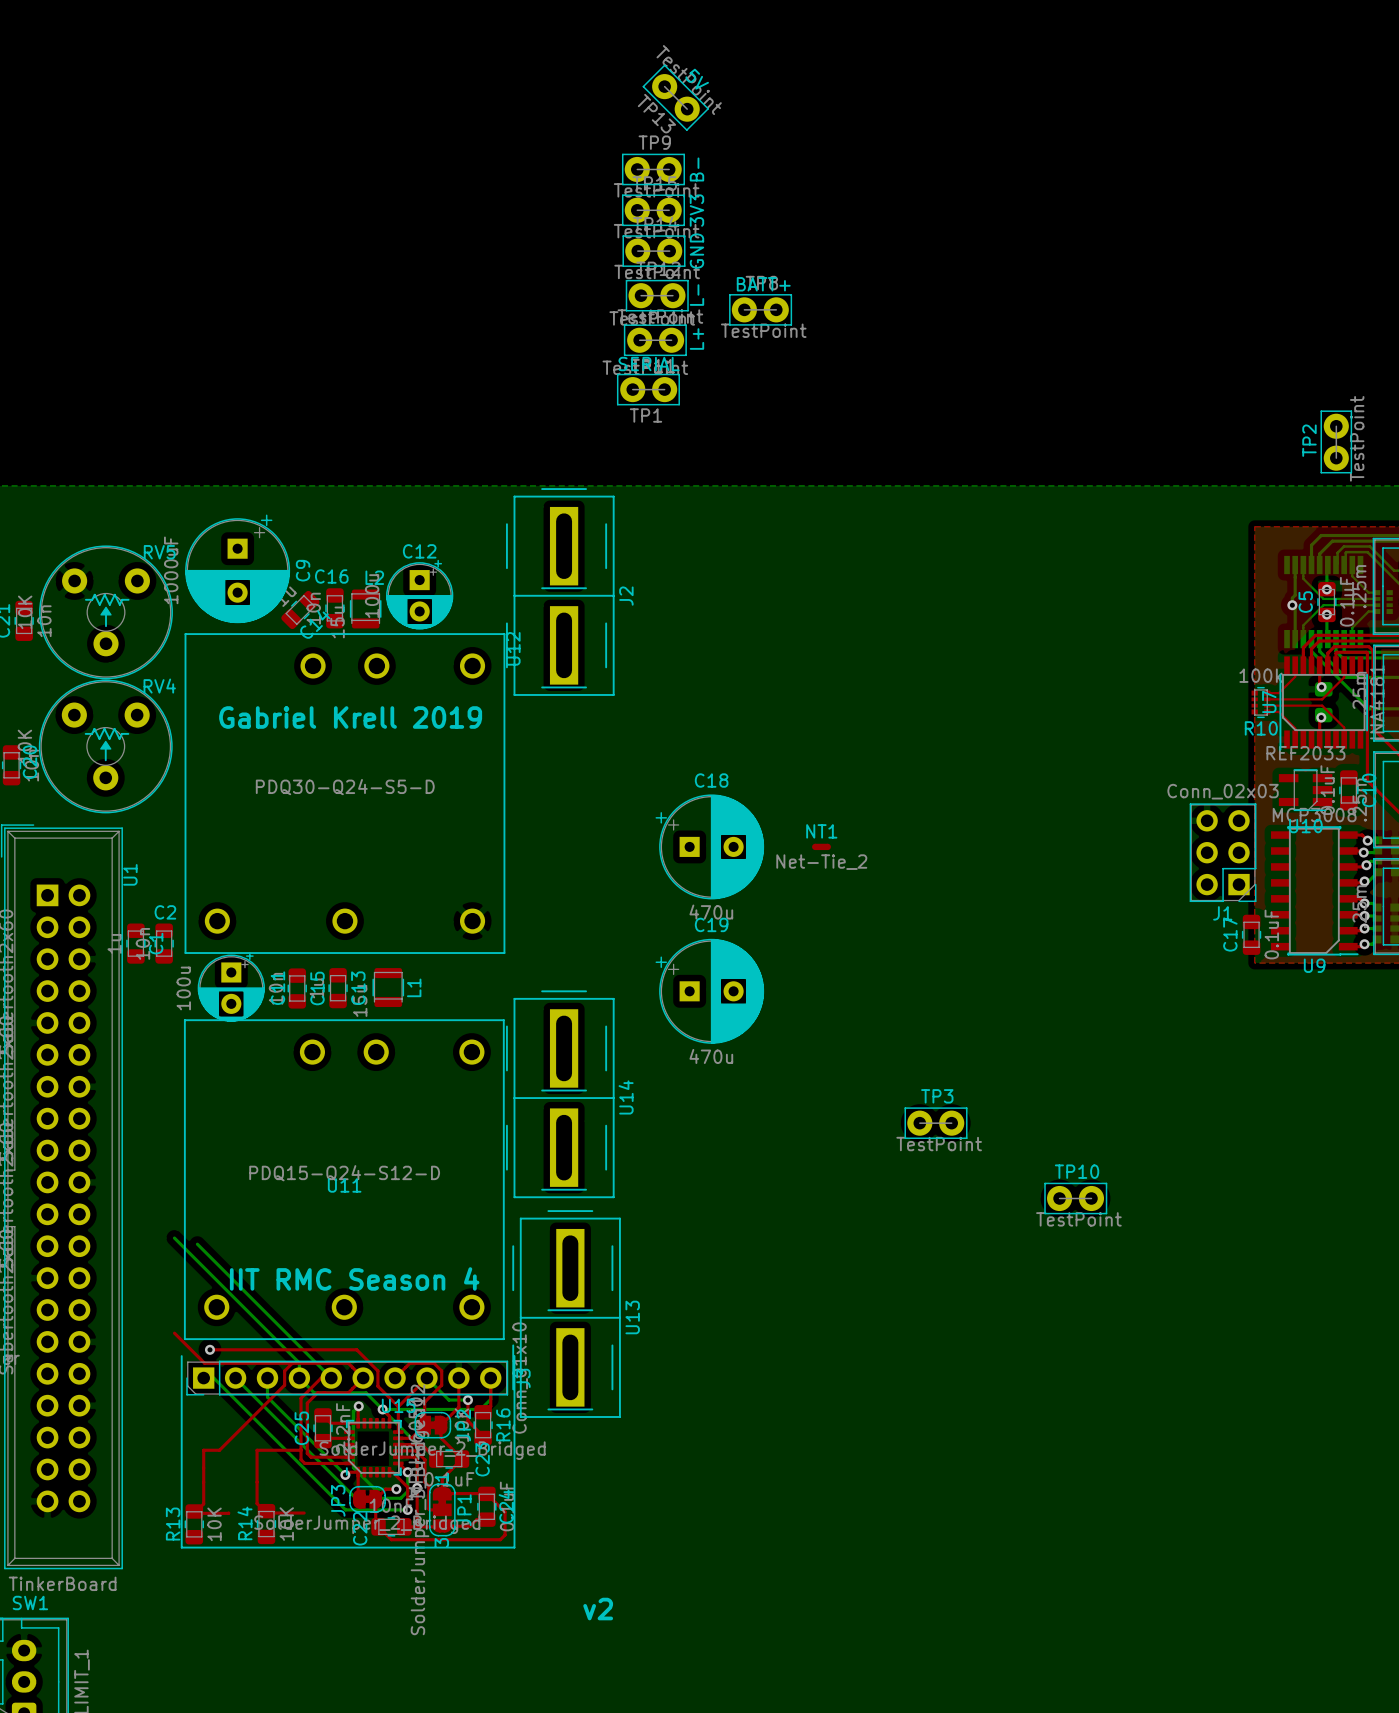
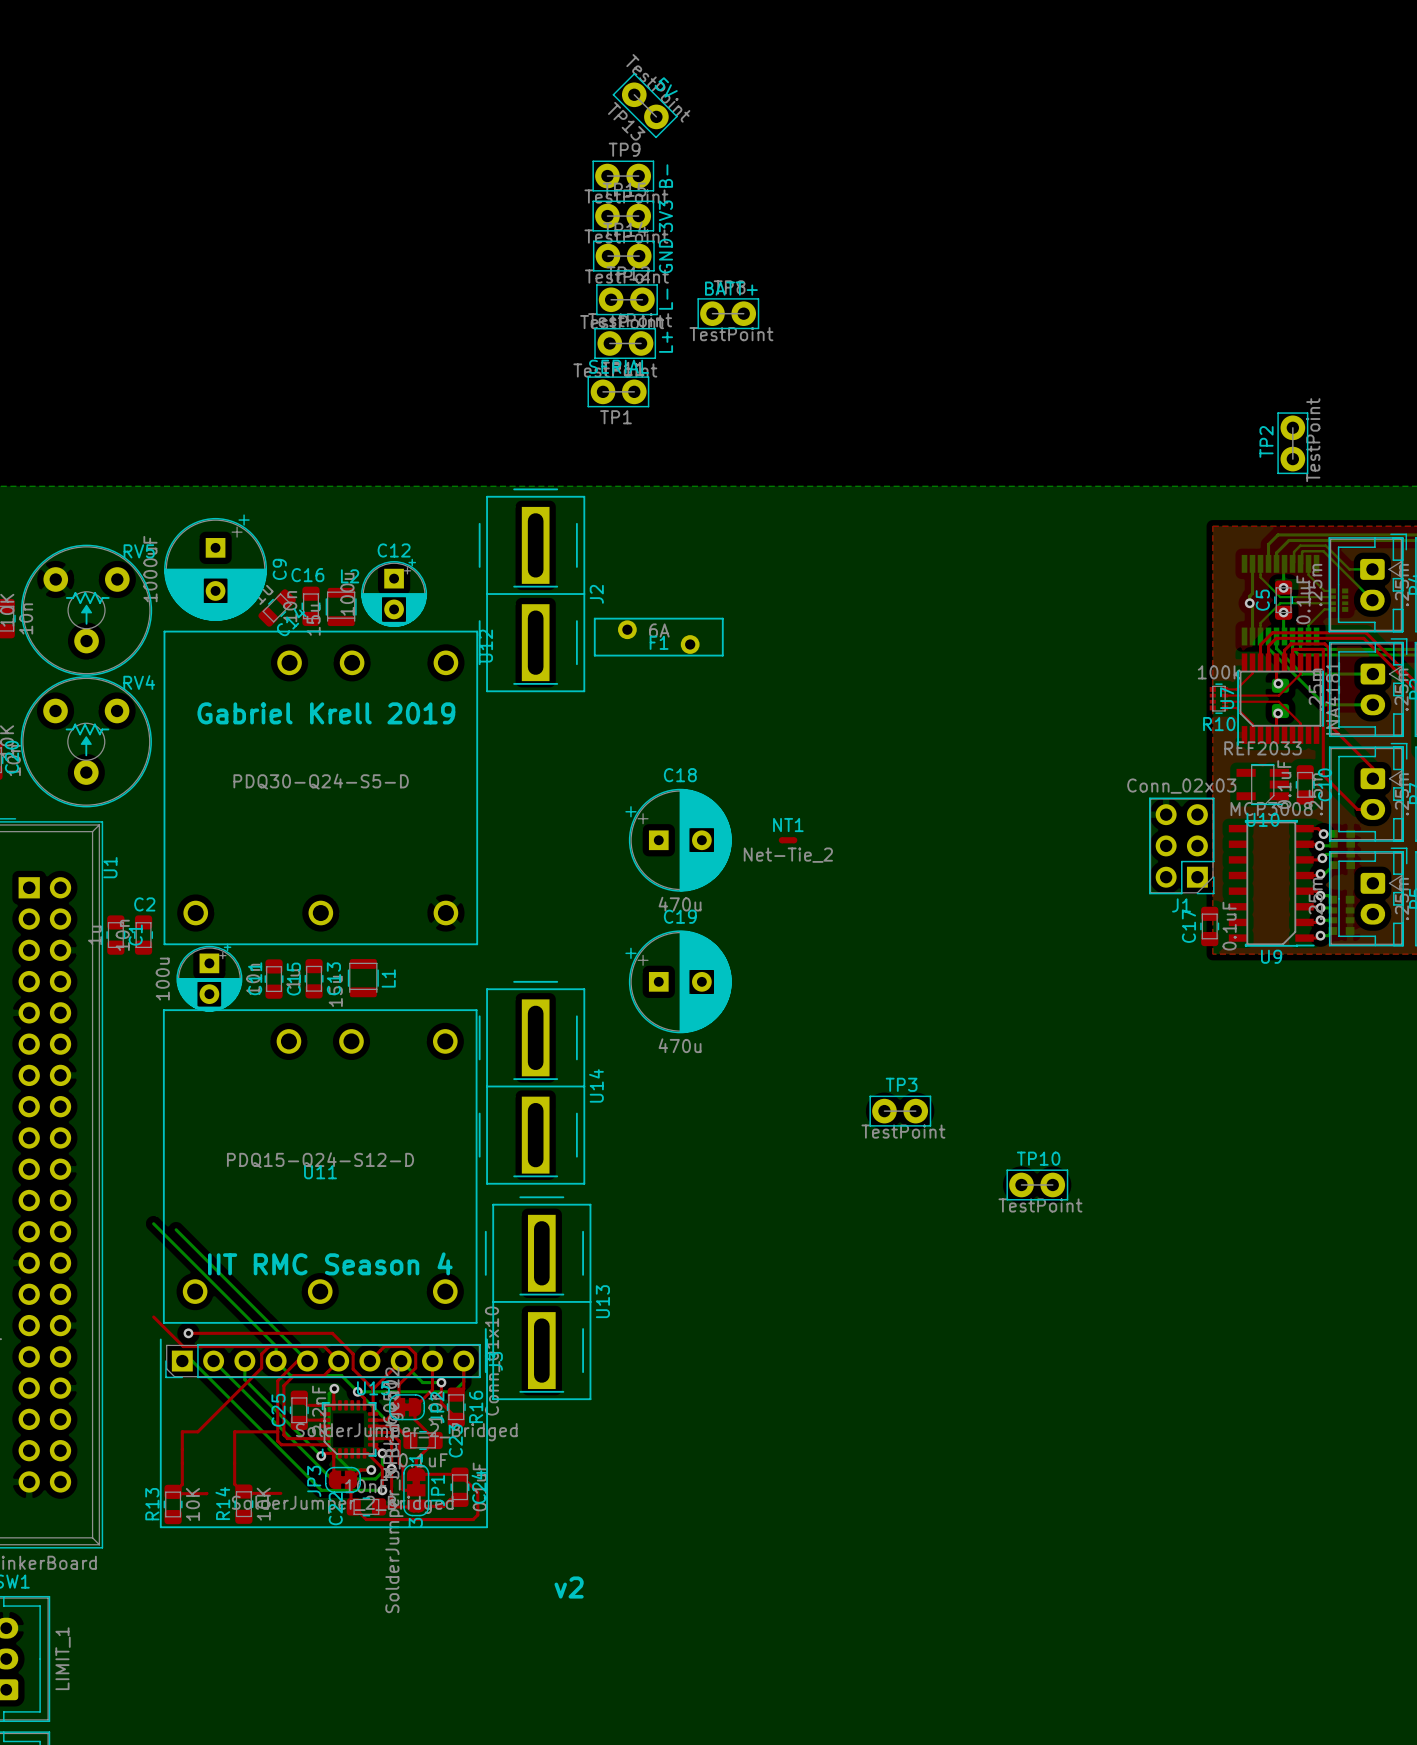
F1: none -> 6A (658, 637)

